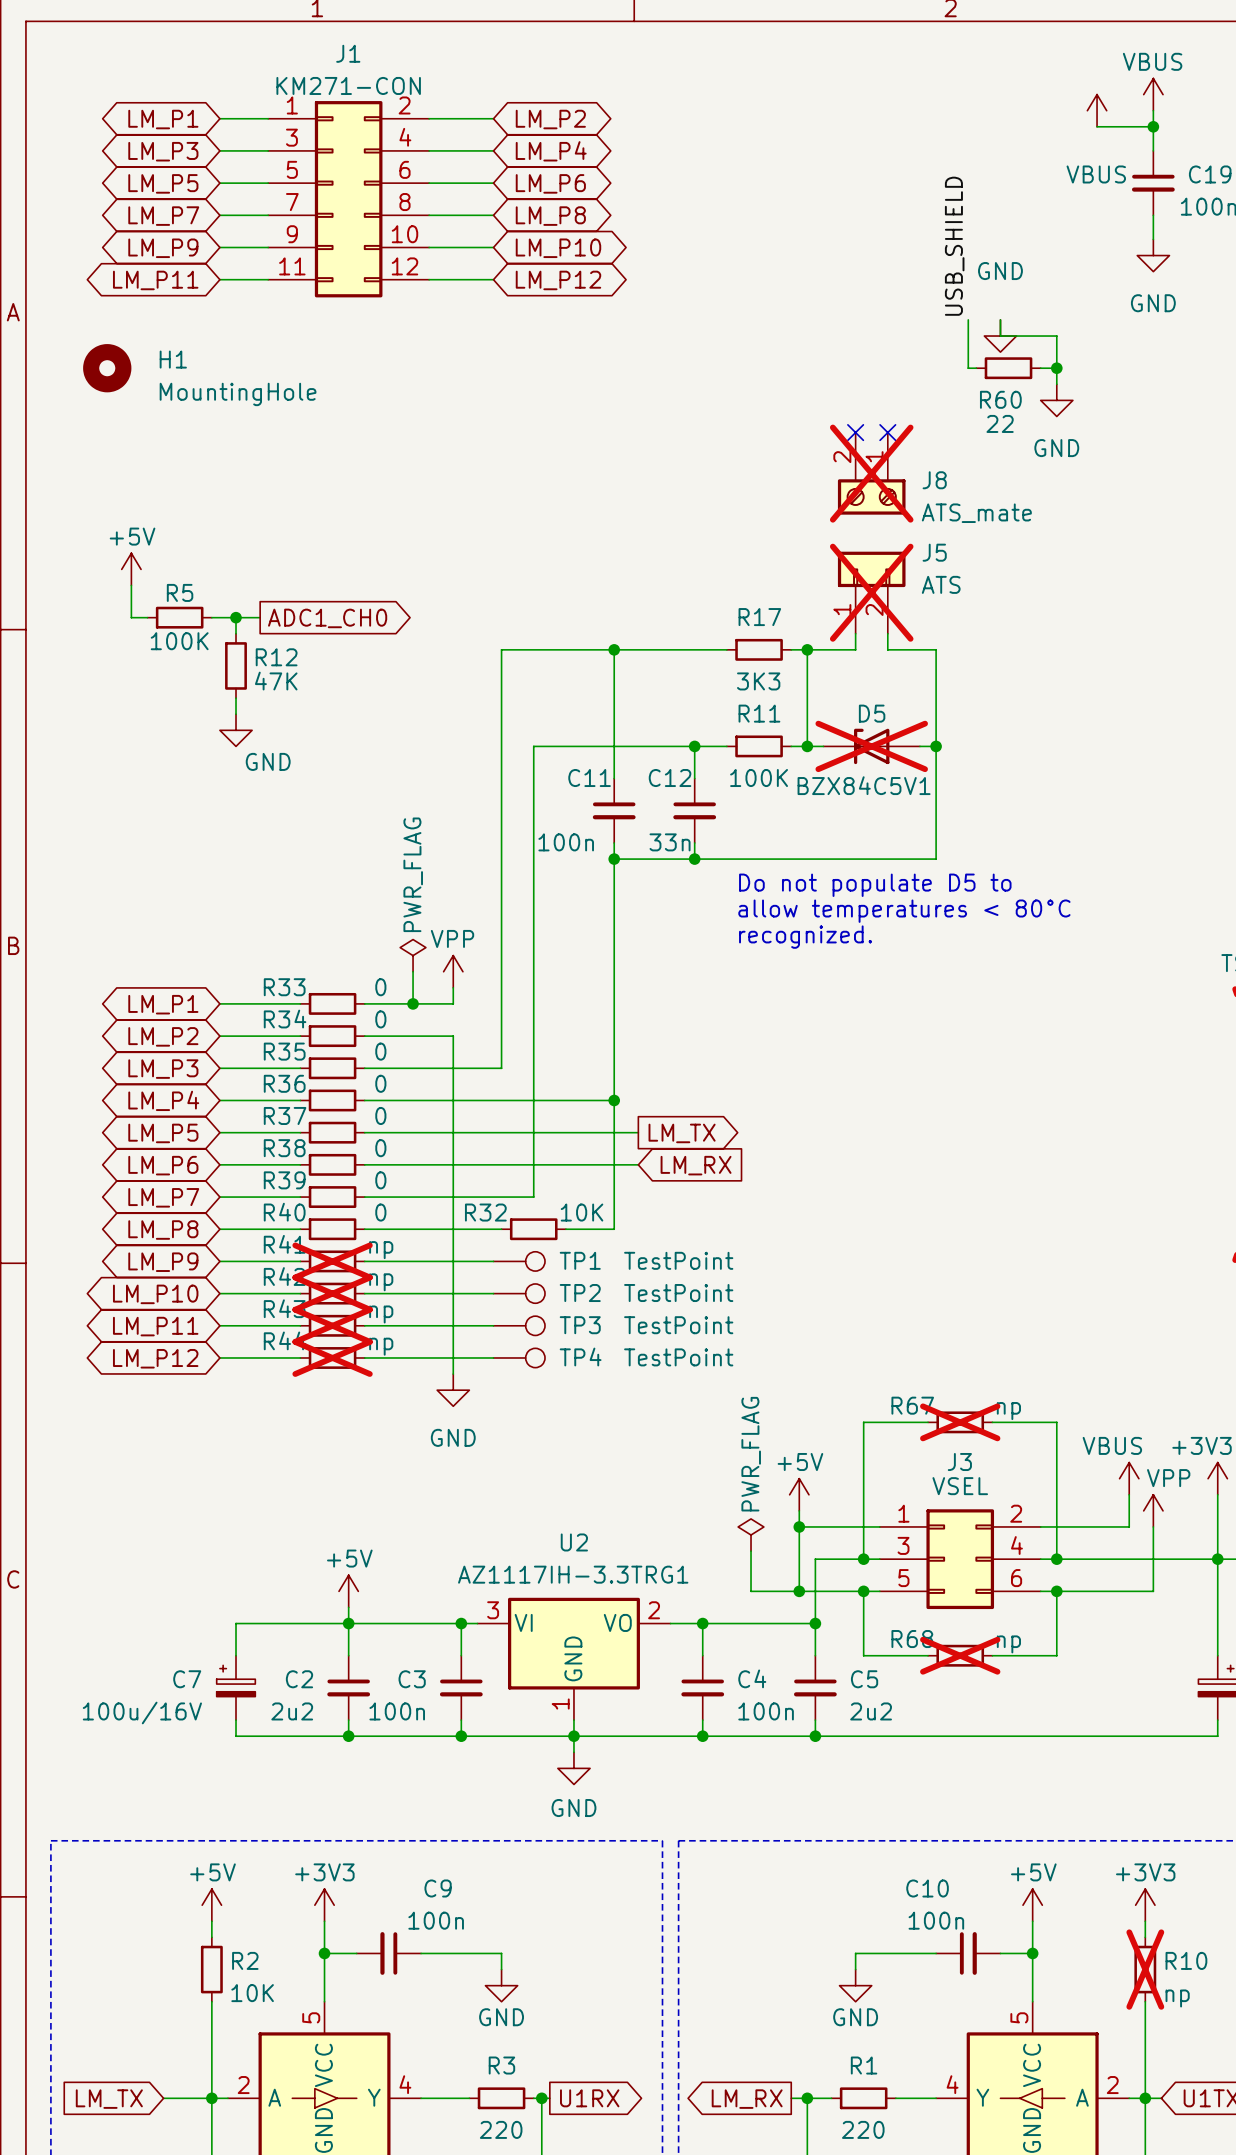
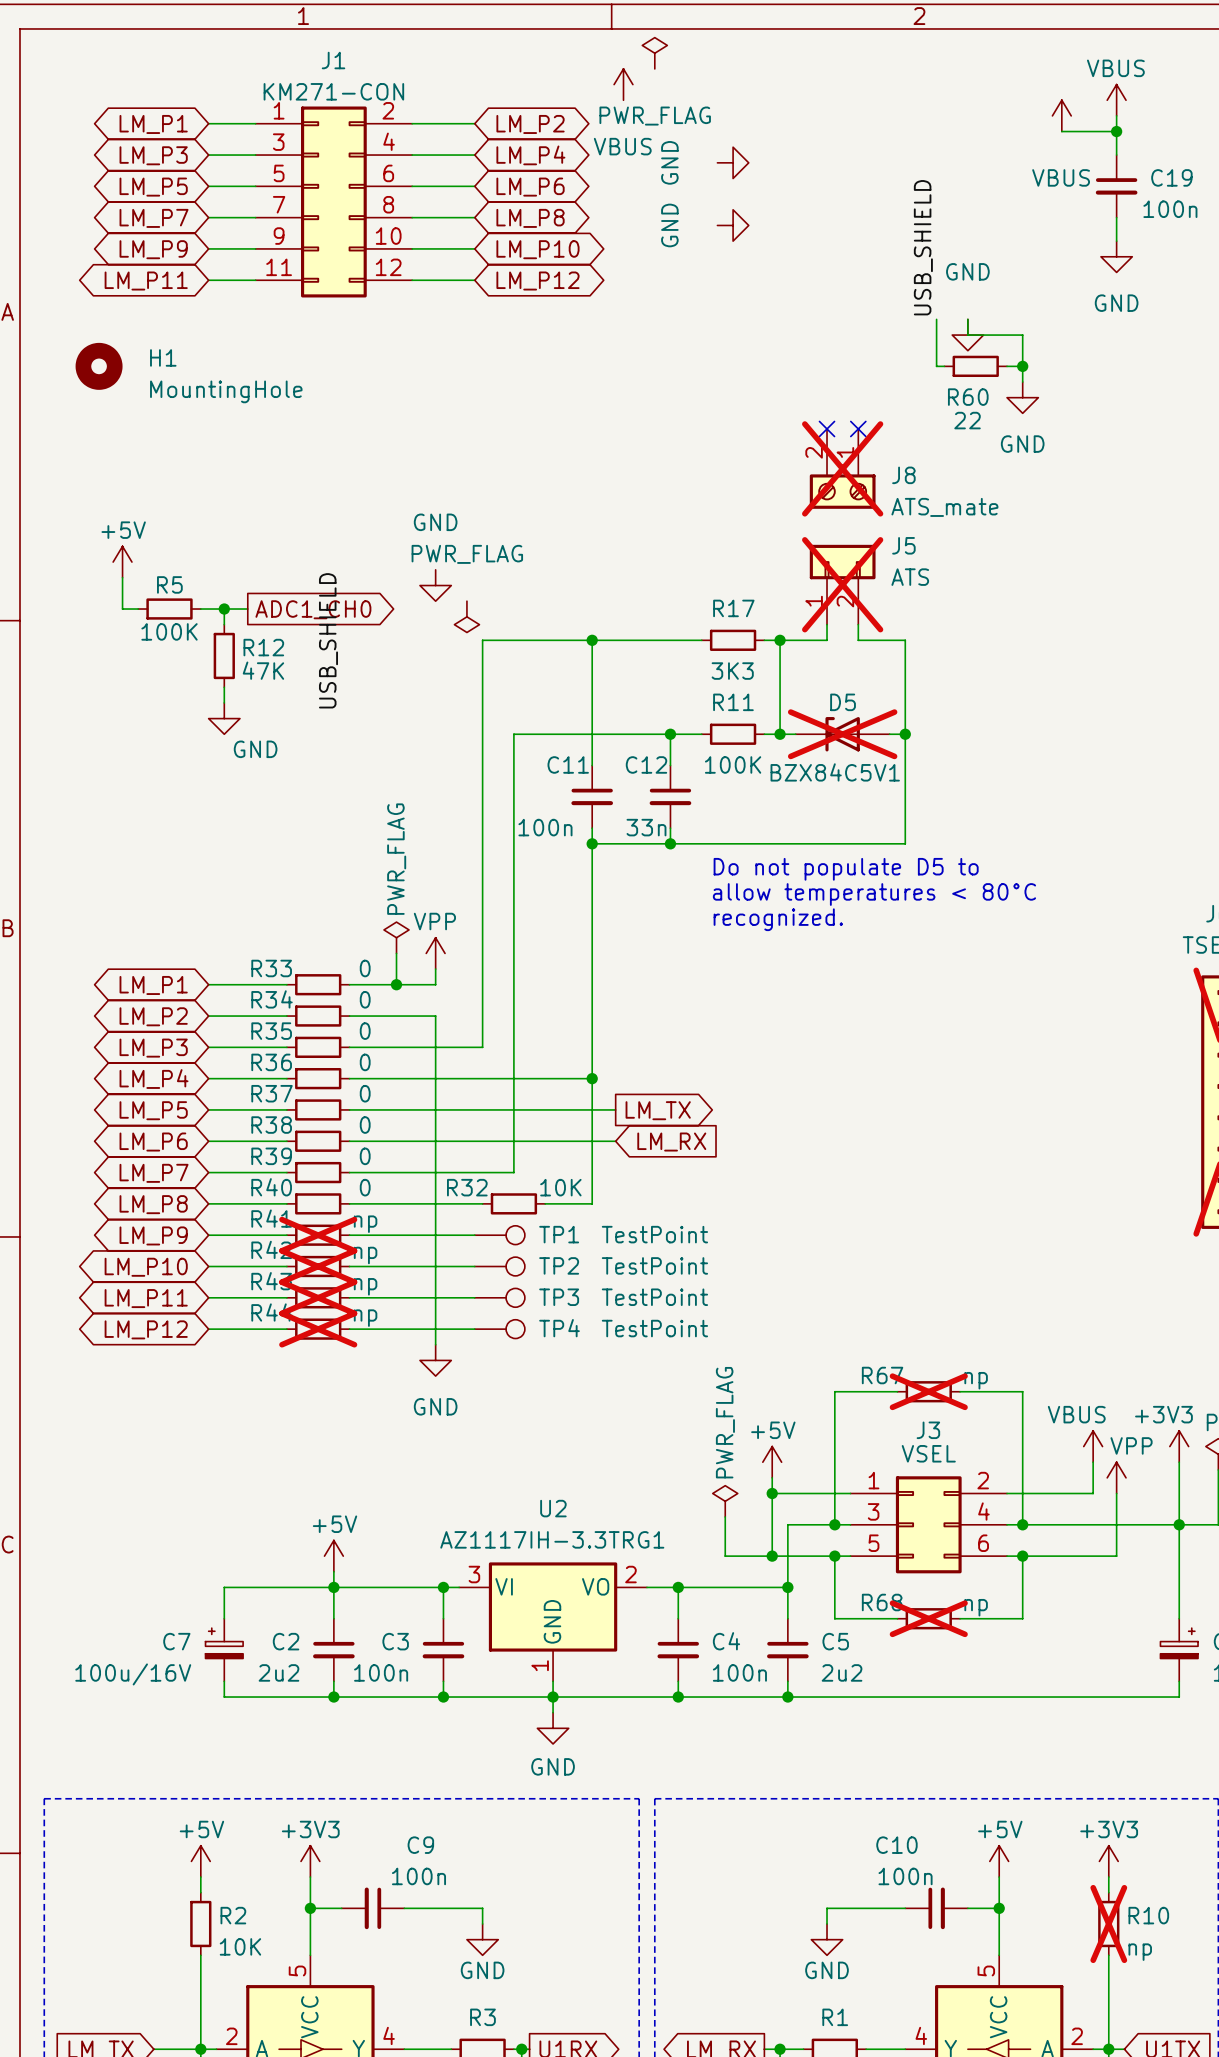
power symbol: none -> PWR_FLAG (654, 53)
power symbol: none -> VBUS (623, 84)
power symbol: none -> GND (733, 162)
power symbol: none -> GND (733, 225)
power symbol: none -> GND (435, 585)
power symbol: none -> PWR_FLAG (466, 616)
label: none -> USB_SHIELD (328, 640)

